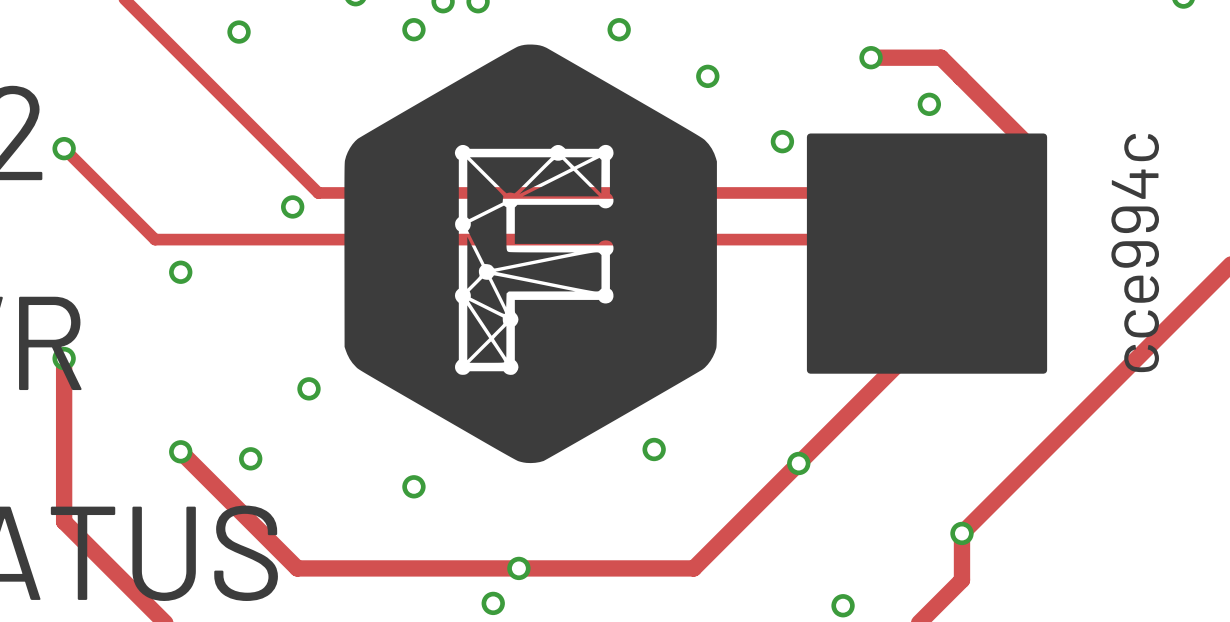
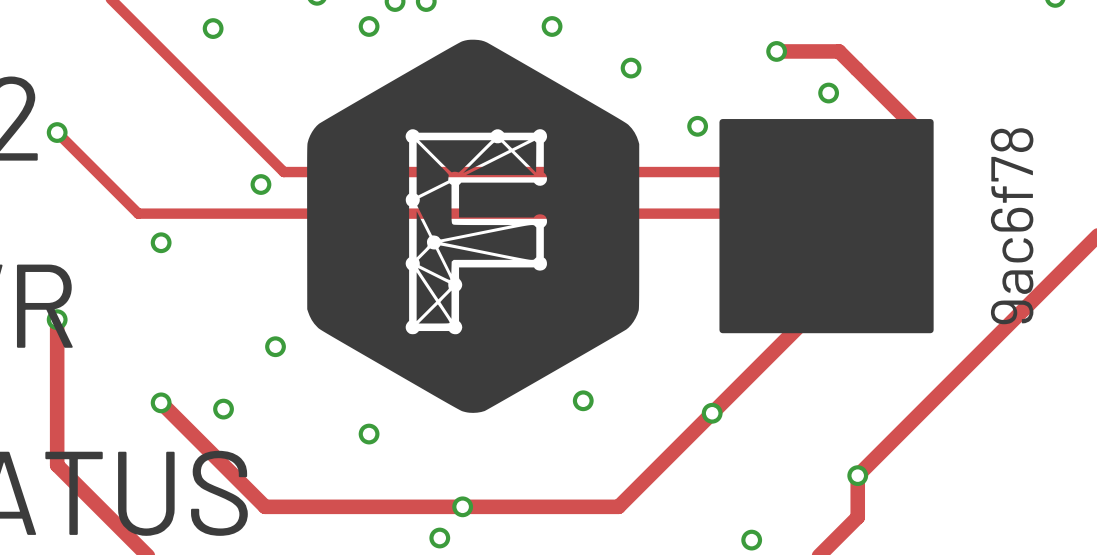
text: cce994c (1135, 253) -> 9ac6f78 (1012, 226)

